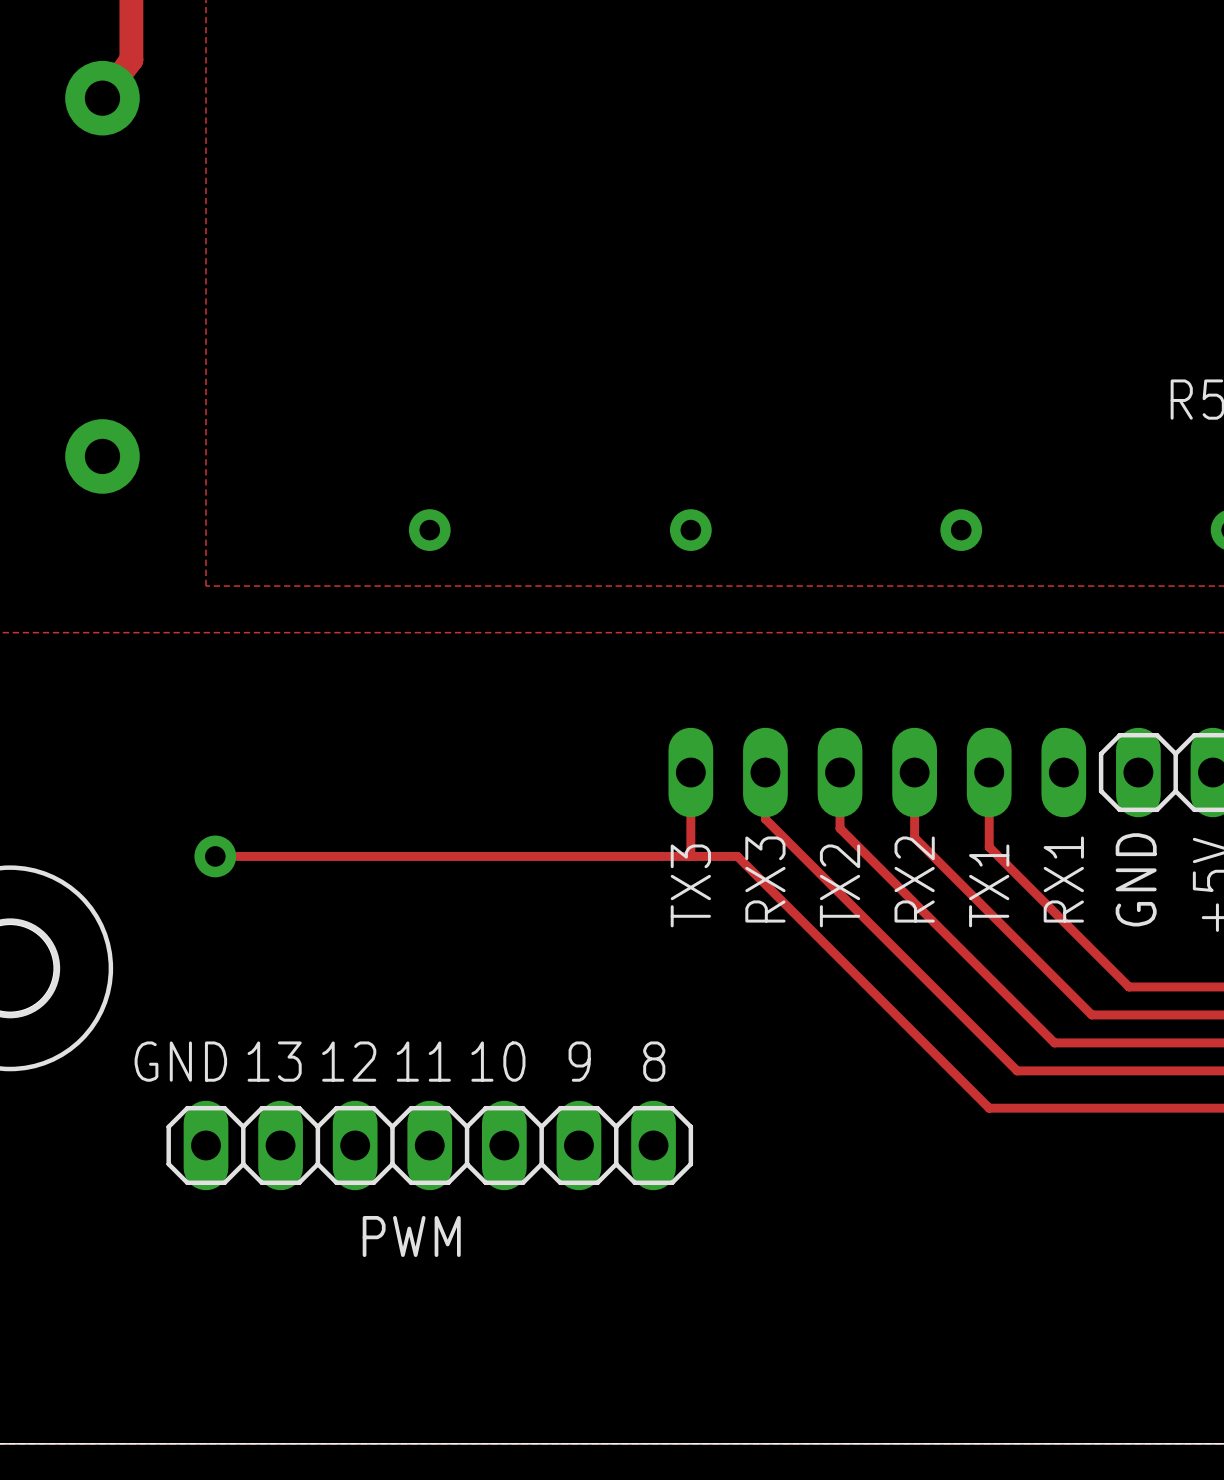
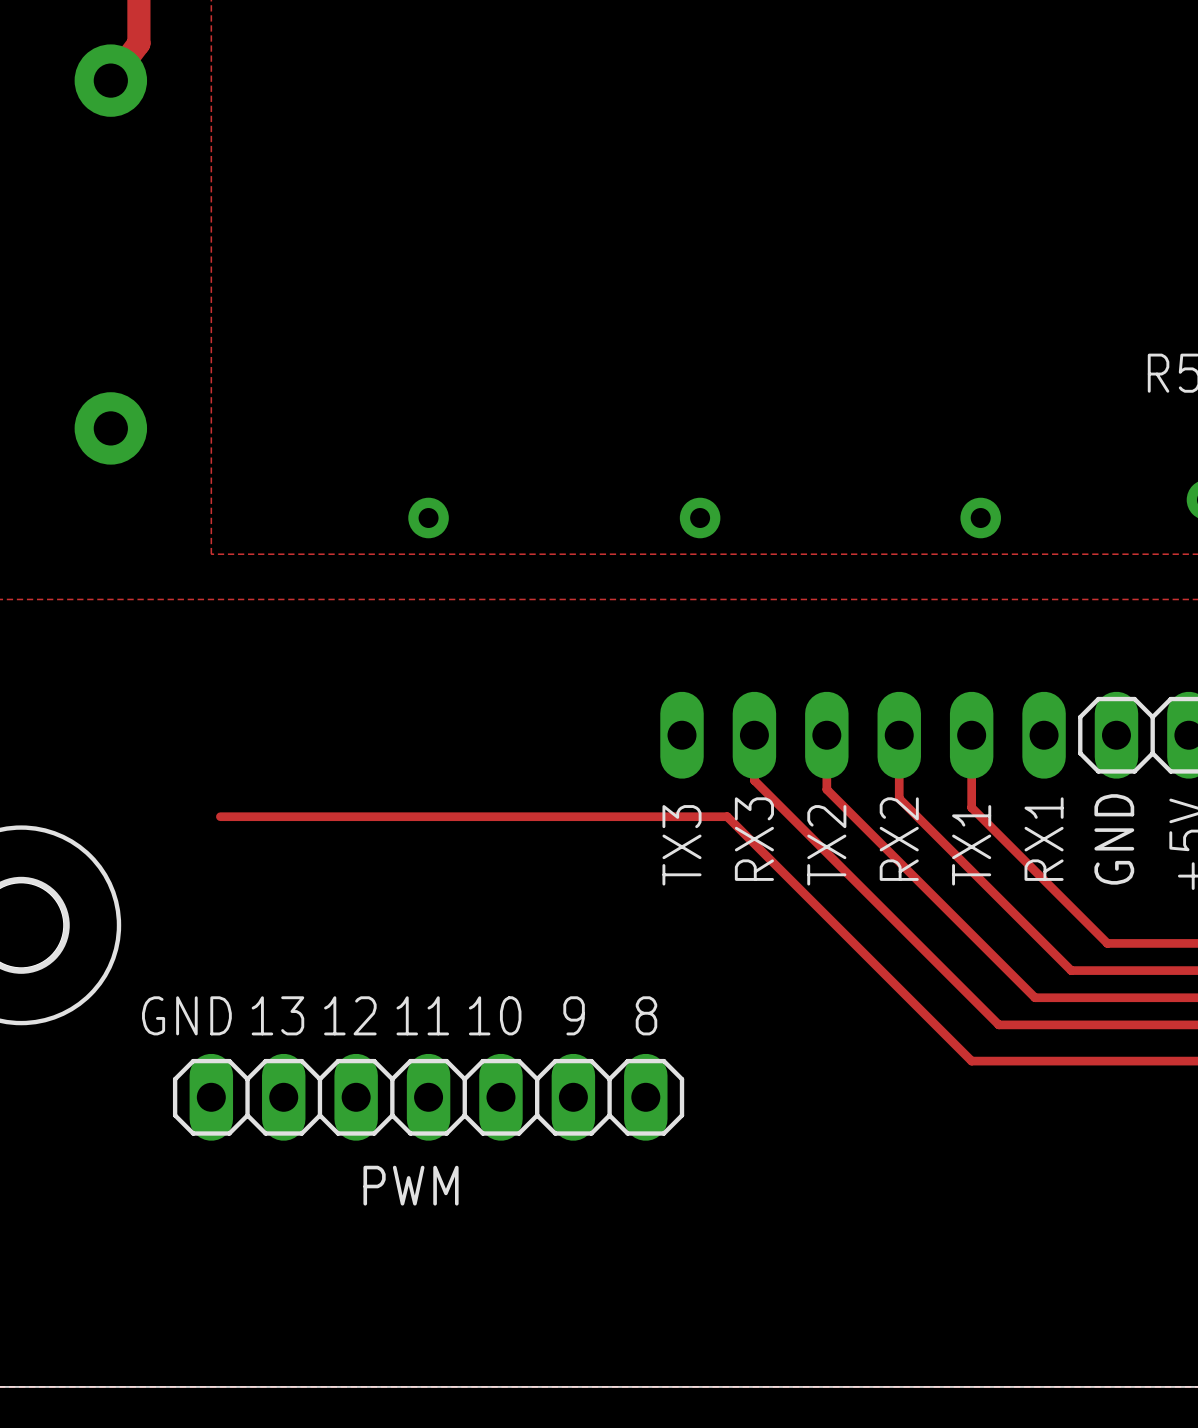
via position: (429, 530) -> (428, 518)
via position: (690, 530) -> (700, 518)
via position: (961, 530) -> (980, 518)
track: (690, 811) (690, 856) -> none
via: (215, 856) -> none

